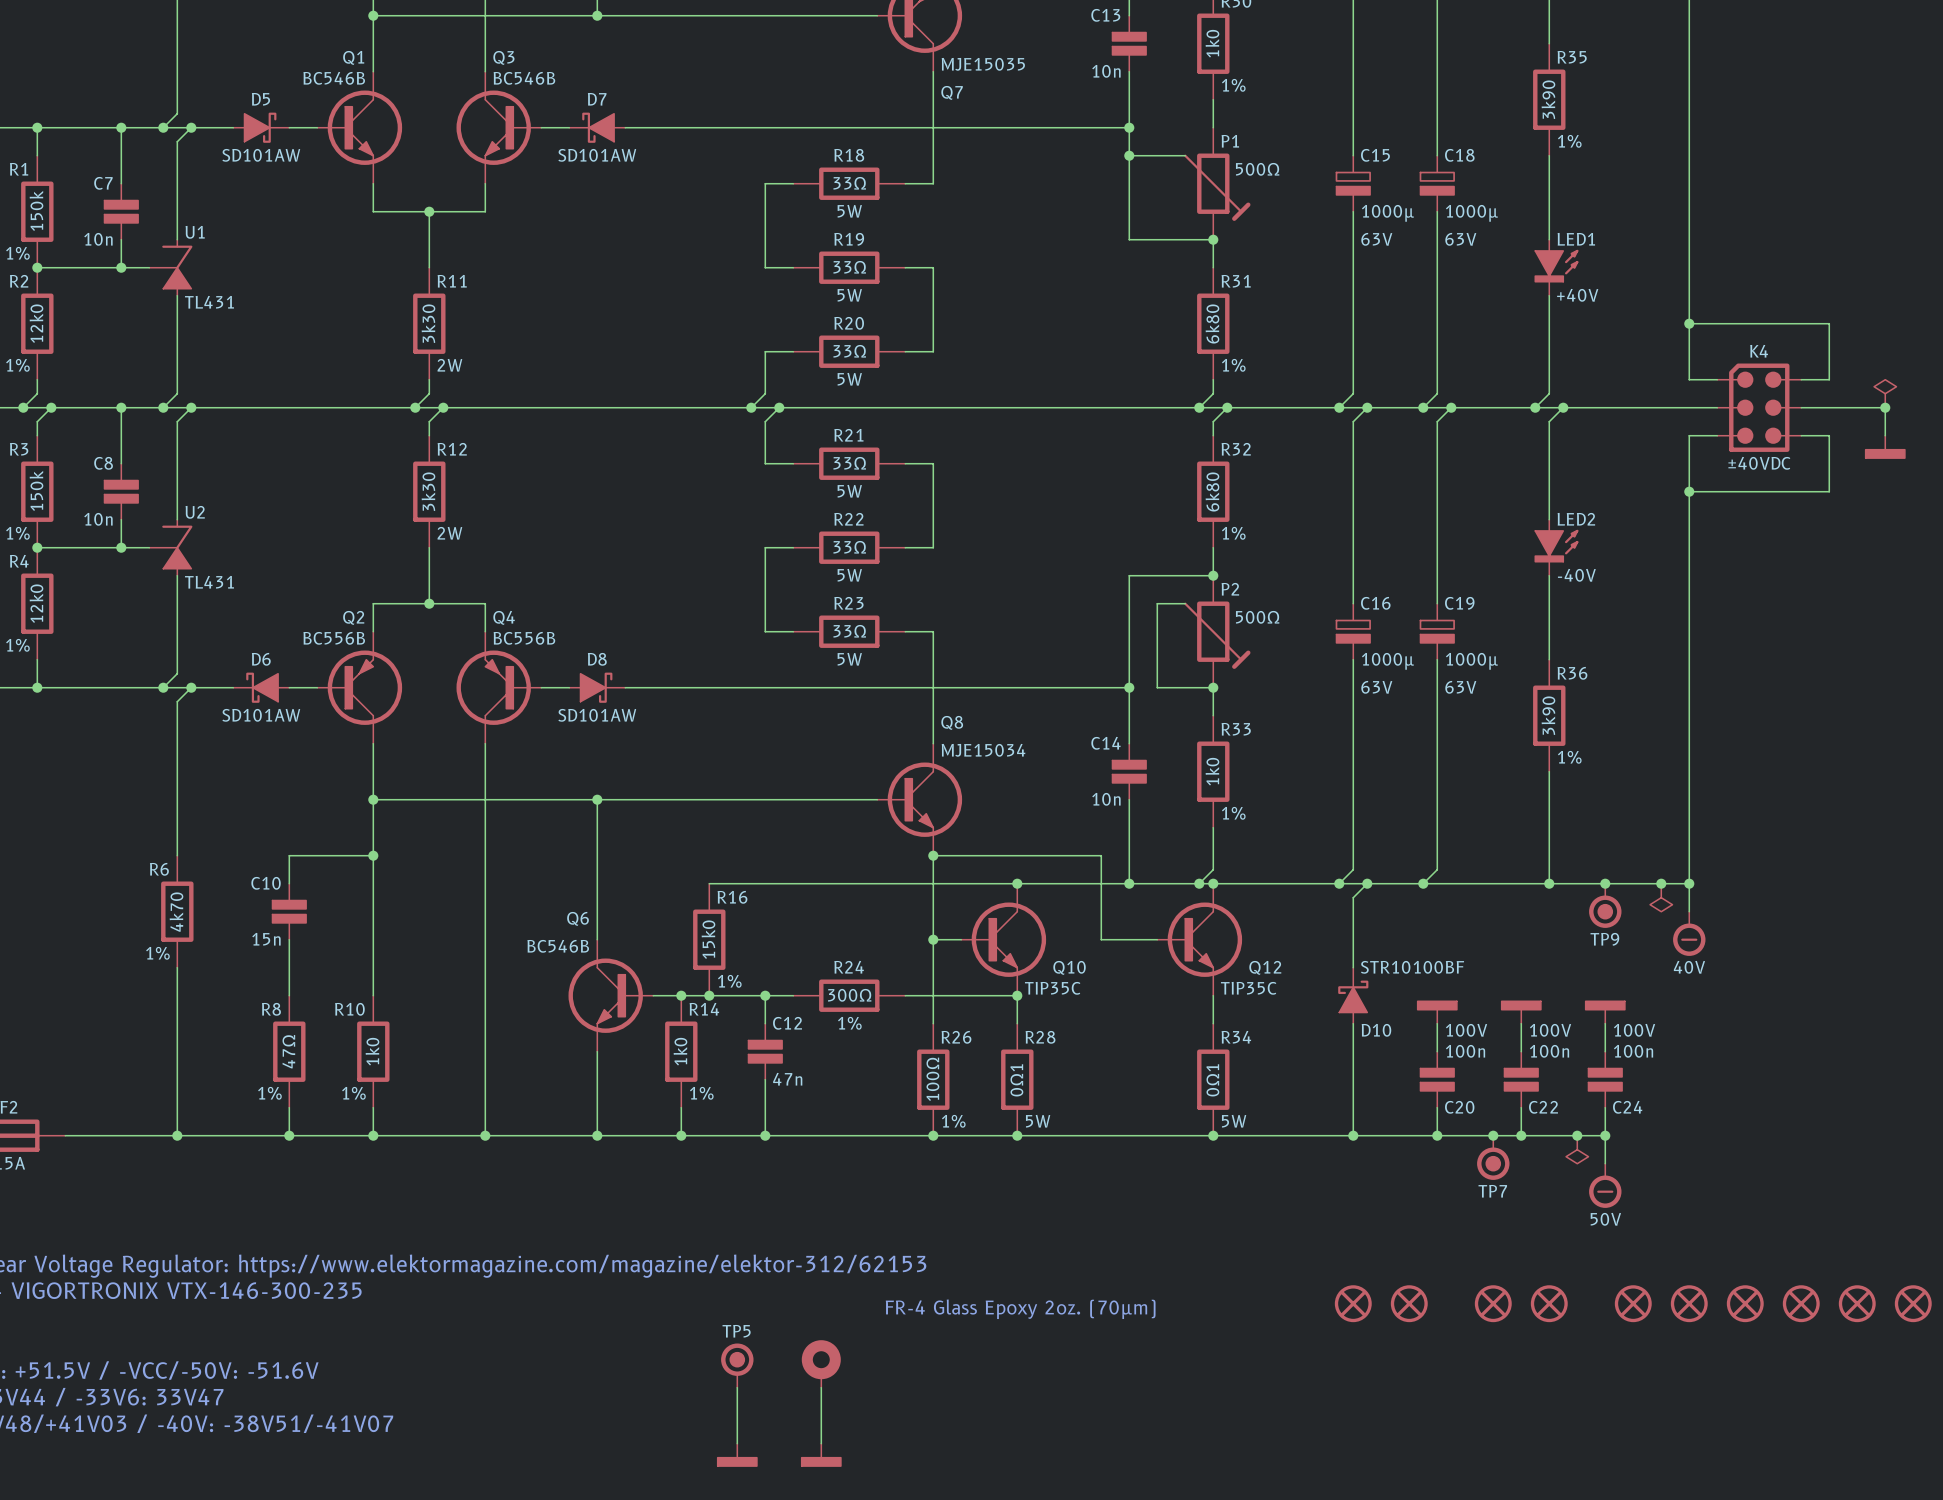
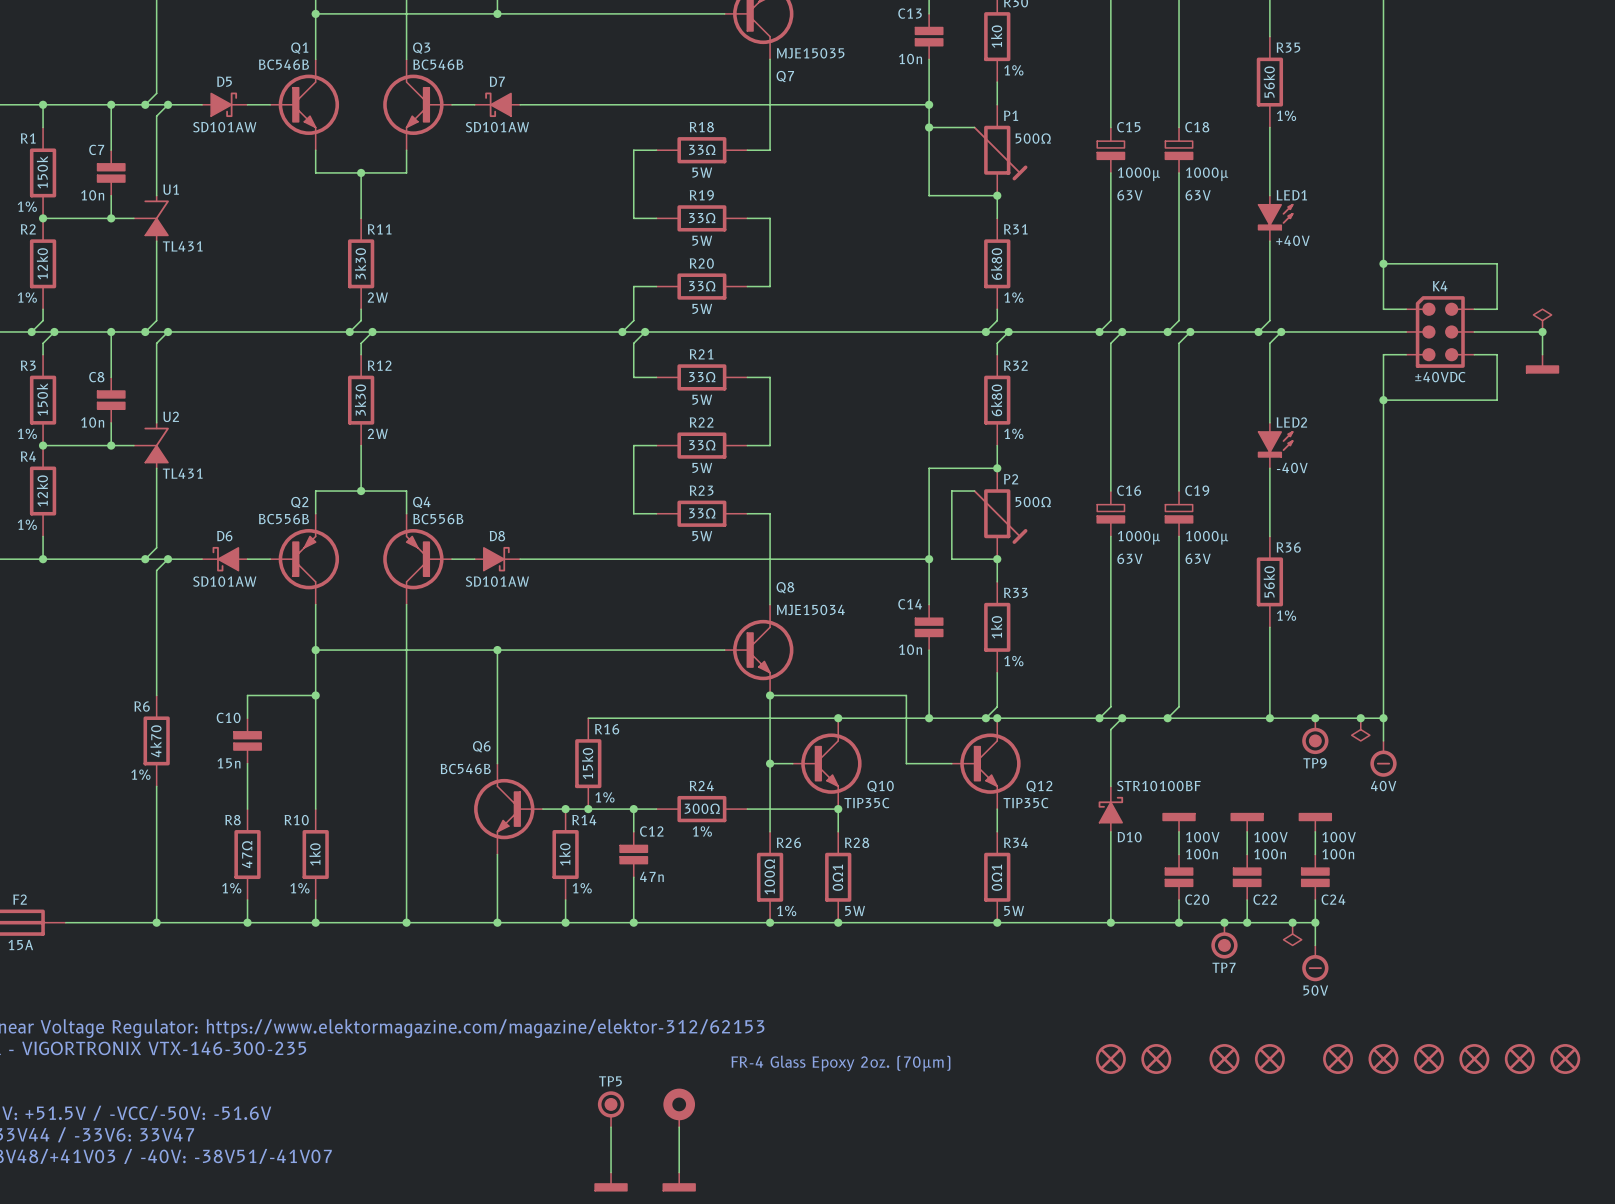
R35 value: 3k90 (1548, 99) -> 56k0 (1269, 82)
R36 value: 3k90 (1548, 715) -> 56k0 (1269, 581)

